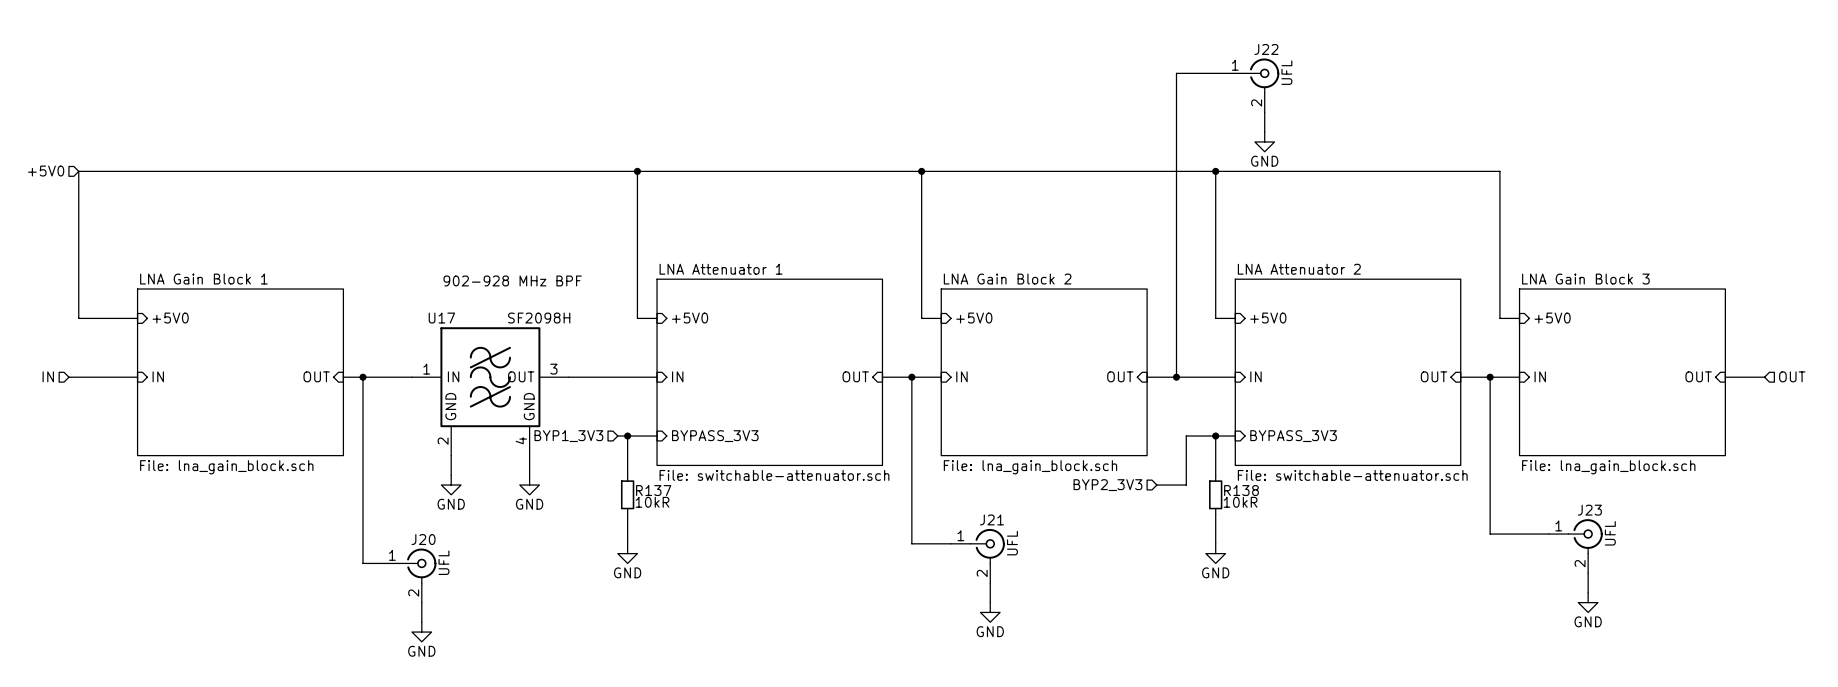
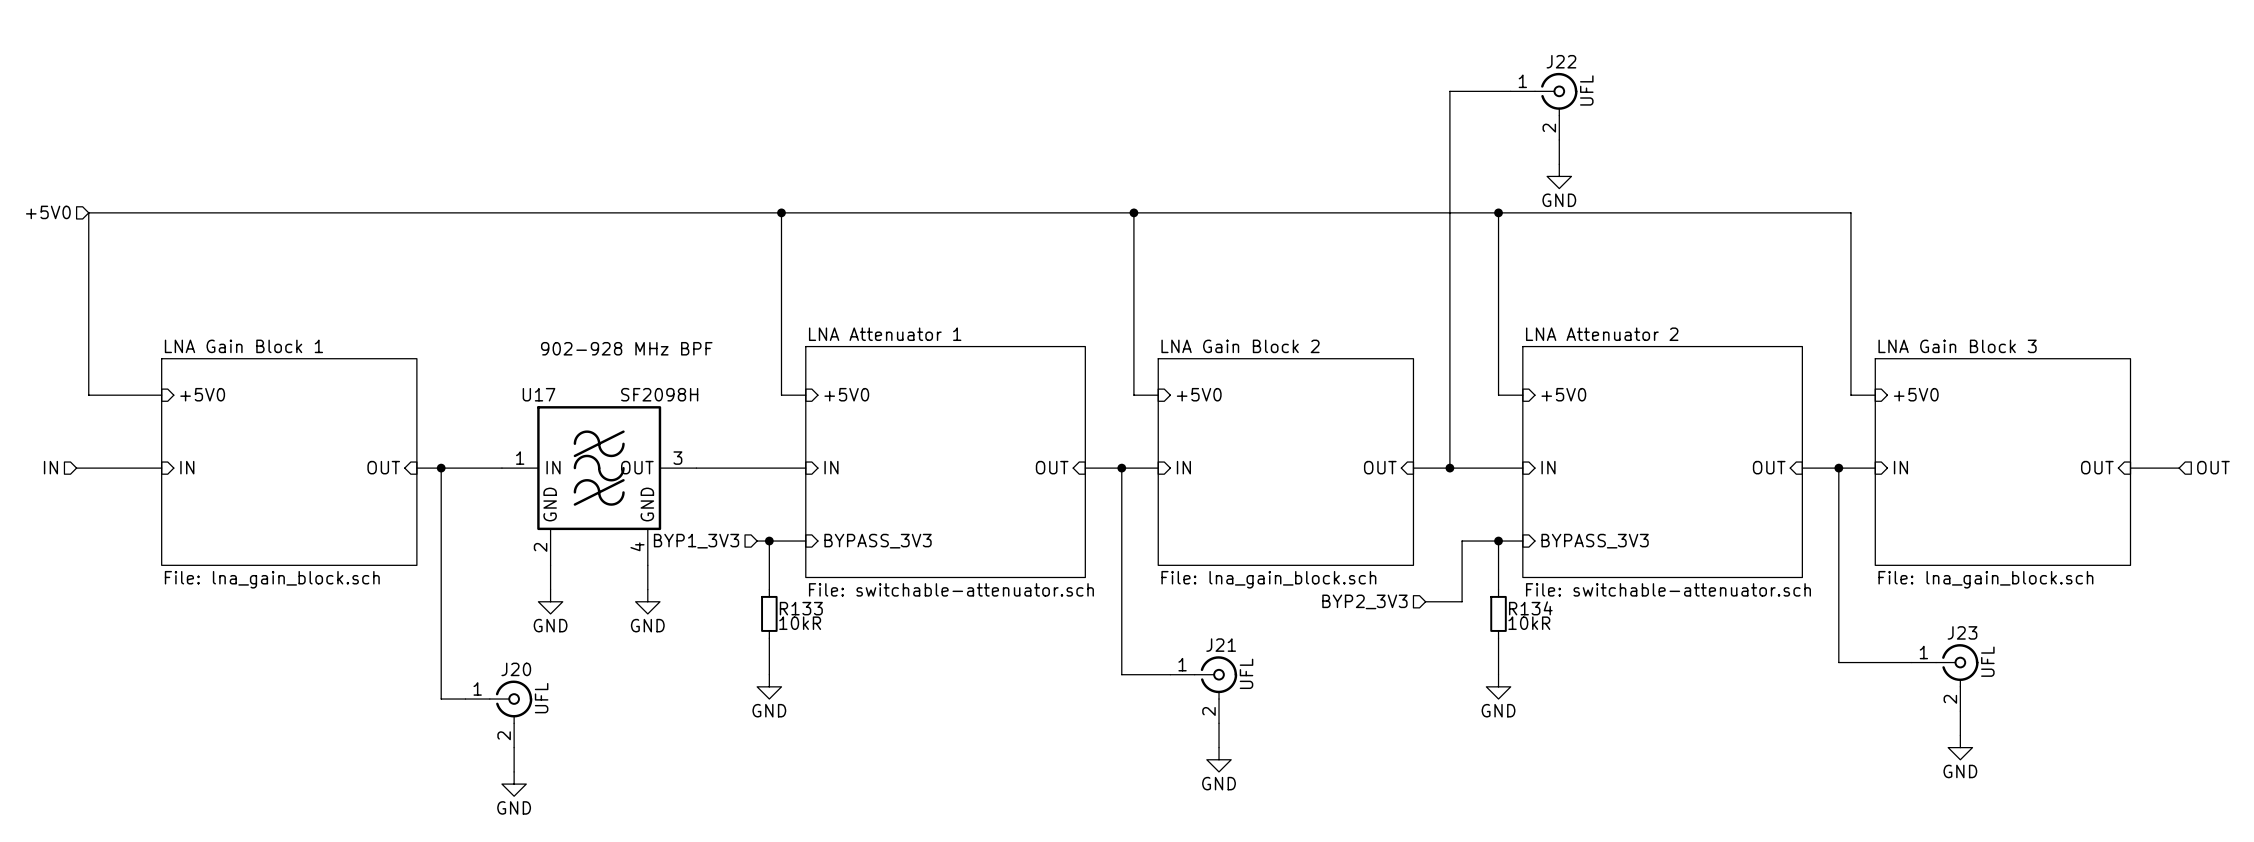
R137 name: R137 (653, 490) -> R133 (801, 608)
R138 name: R138 (1241, 490) -> R134 (1530, 608)

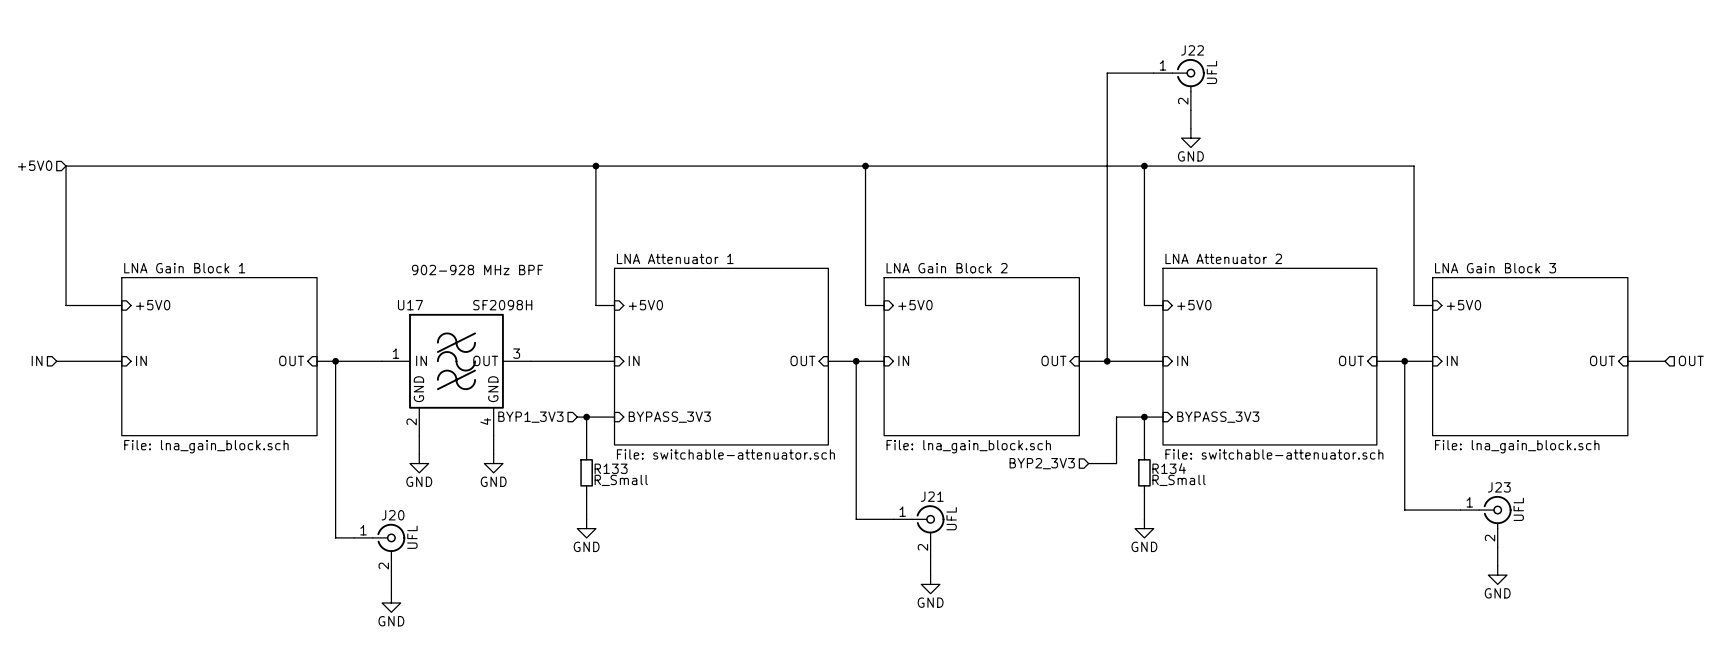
R133 value: 10kR (800, 623) -> R_Small (621, 480)
R134 value: 10kR (1529, 623) -> R_Small (1179, 480)

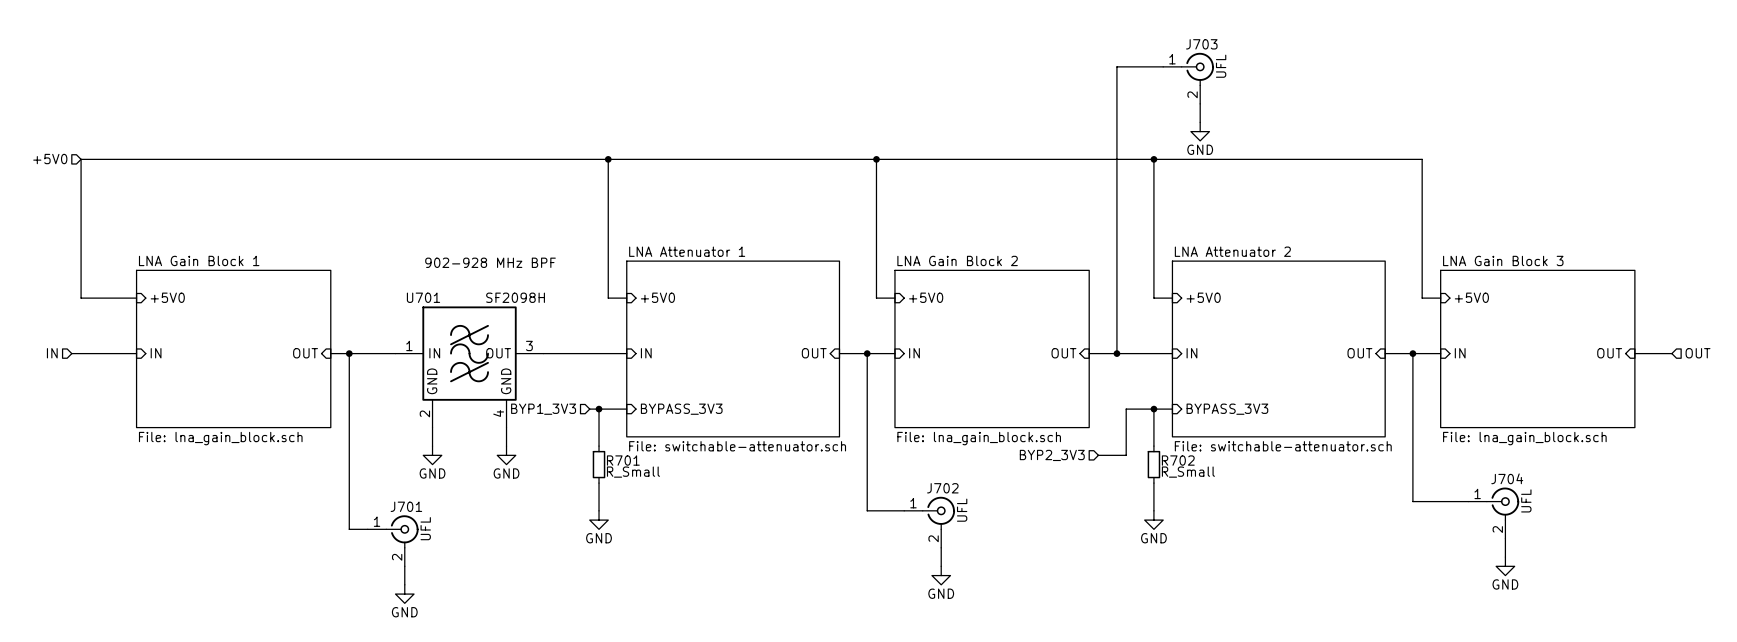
J22 name: J22 (1192, 50) -> J703 (1201, 44)
U17 name: U17 (410, 305) -> U701 (423, 297)
R133 name: R133 (611, 468) -> R701 (623, 460)
R134 name: R134 (1169, 468) -> R702 (1178, 460)
J23 name: J23 (1499, 487) -> J704 (1507, 478)
J21 name: J21 (932, 496) -> J702 (942, 488)
J20 name: J20 (393, 515) -> J701 (406, 506)

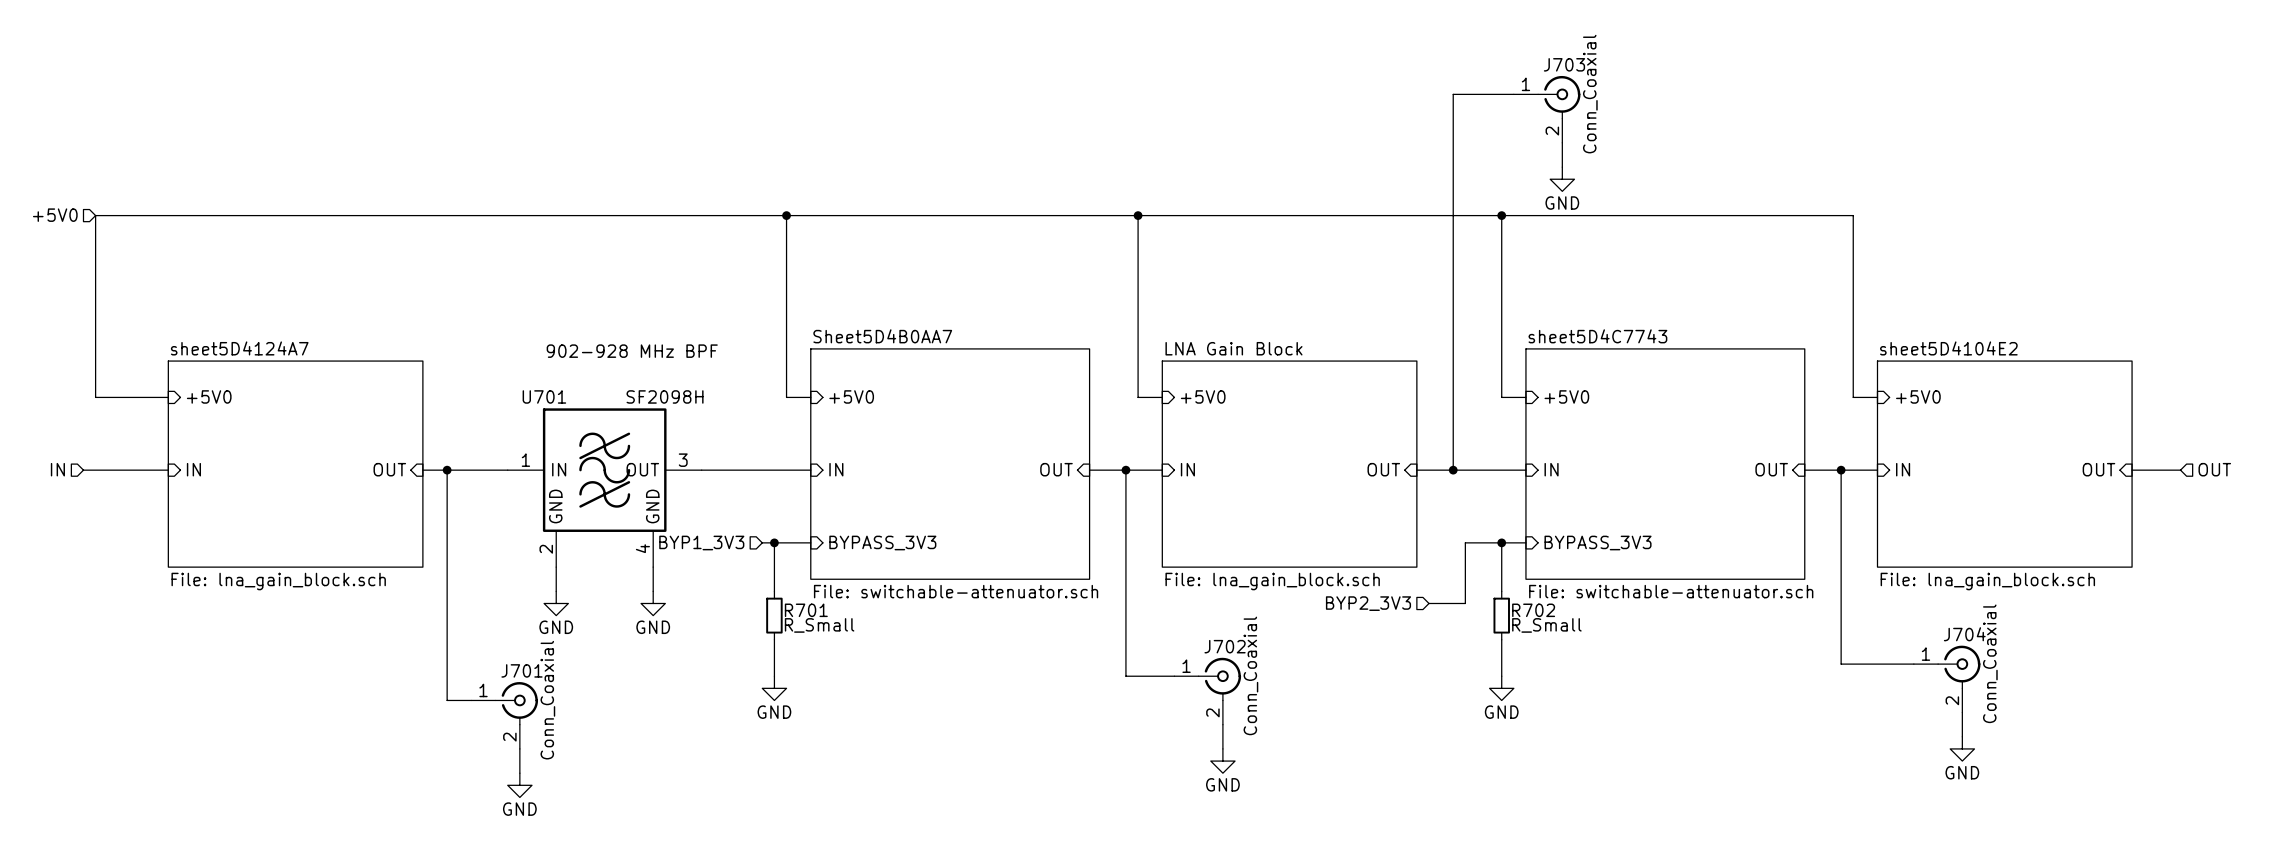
J703 value: UFL (1221, 66) -> Conn_Coaxial (1590, 94)
sheet LNA Attenuator 1 name: LNA Attenuator 1 (687, 251) -> Sheet5D4B0AA7 (882, 336)
sheet LNA Attenuator 2 name: LNA Attenuator 2 (1232, 251) -> sheet5D4C7743 (1597, 336)
sheet LNA Gain Block 1 name: LNA Gain Block 1 (199, 260) -> sheet5D4124A7 (239, 348)
sheet LNA Gain Block 2 name: LNA Gain Block 2 (957, 260) -> LNA Gain Block (1233, 348)
sheet LNA Gain Block 3 name: LNA Gain Block 3 (1503, 260) -> sheet5D4104E2 (1948, 348)
J704 value: UFL (1526, 500) -> Conn_Coaxial (1990, 663)
J702 value: UFL (962, 510) -> Conn_Coaxial (1250, 675)
J701 value: UFL (425, 528) -> Conn_Coaxial (547, 700)

